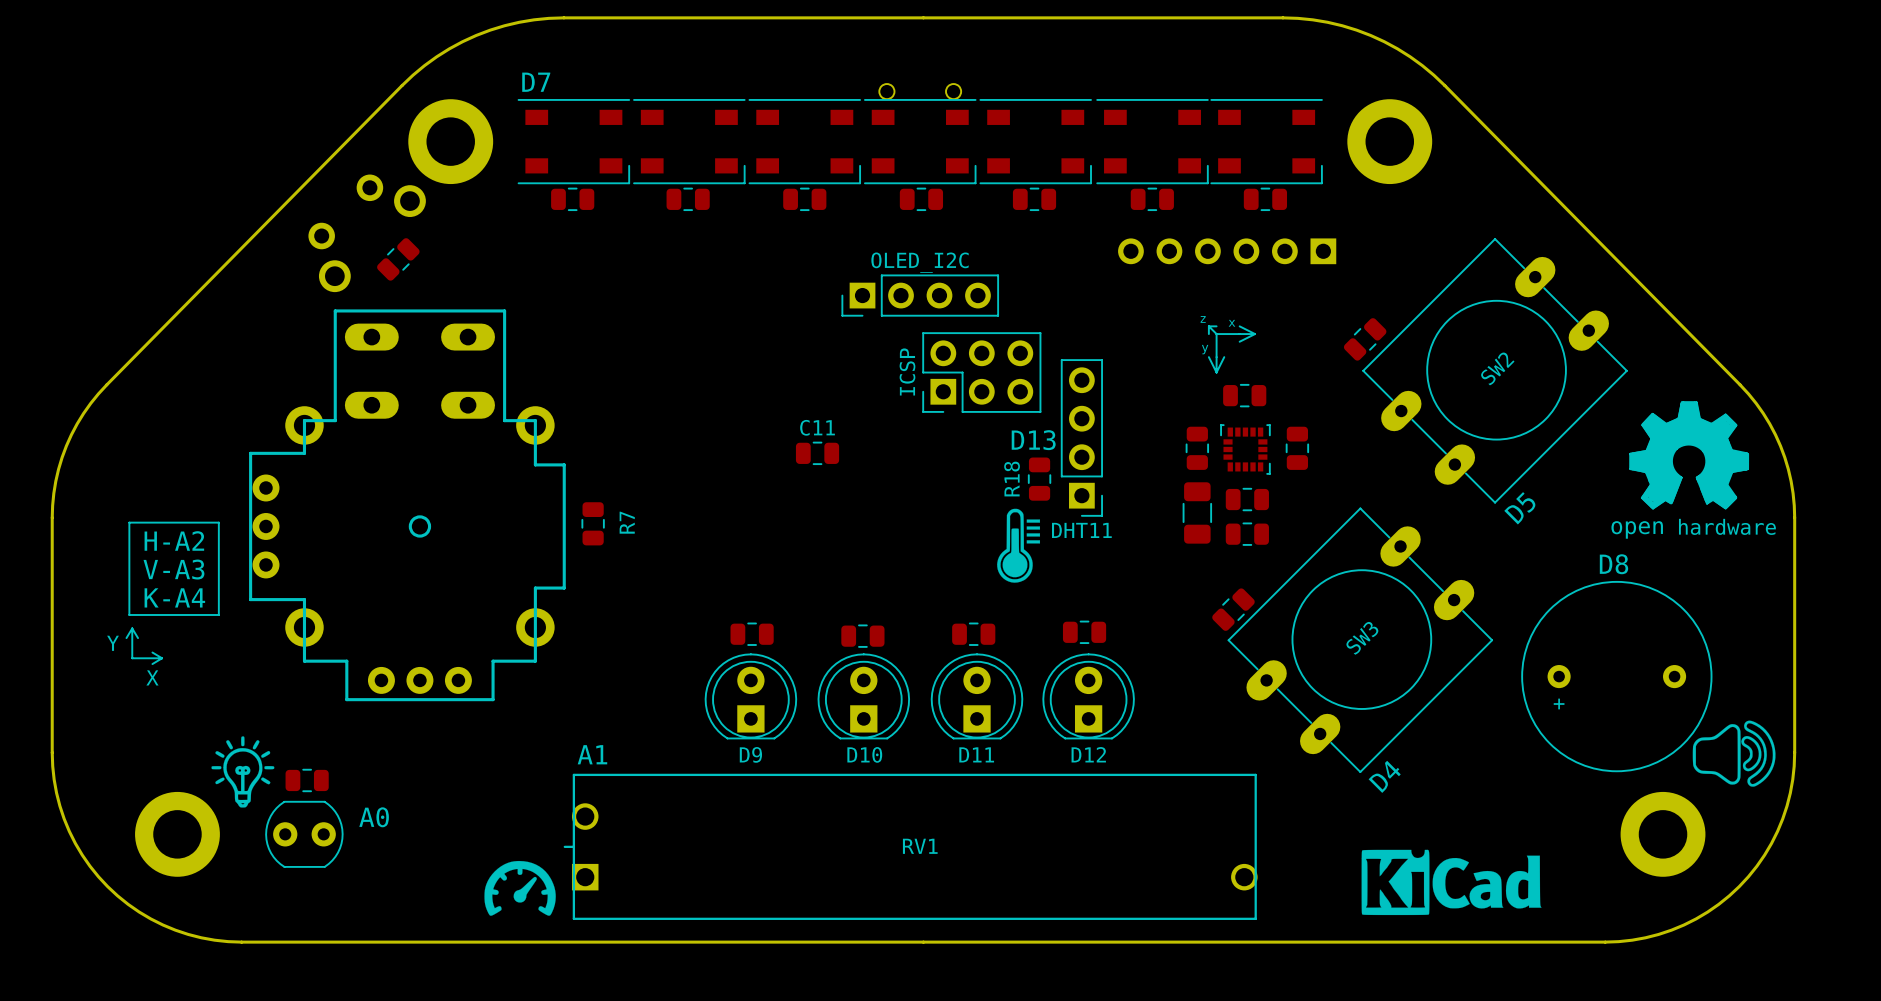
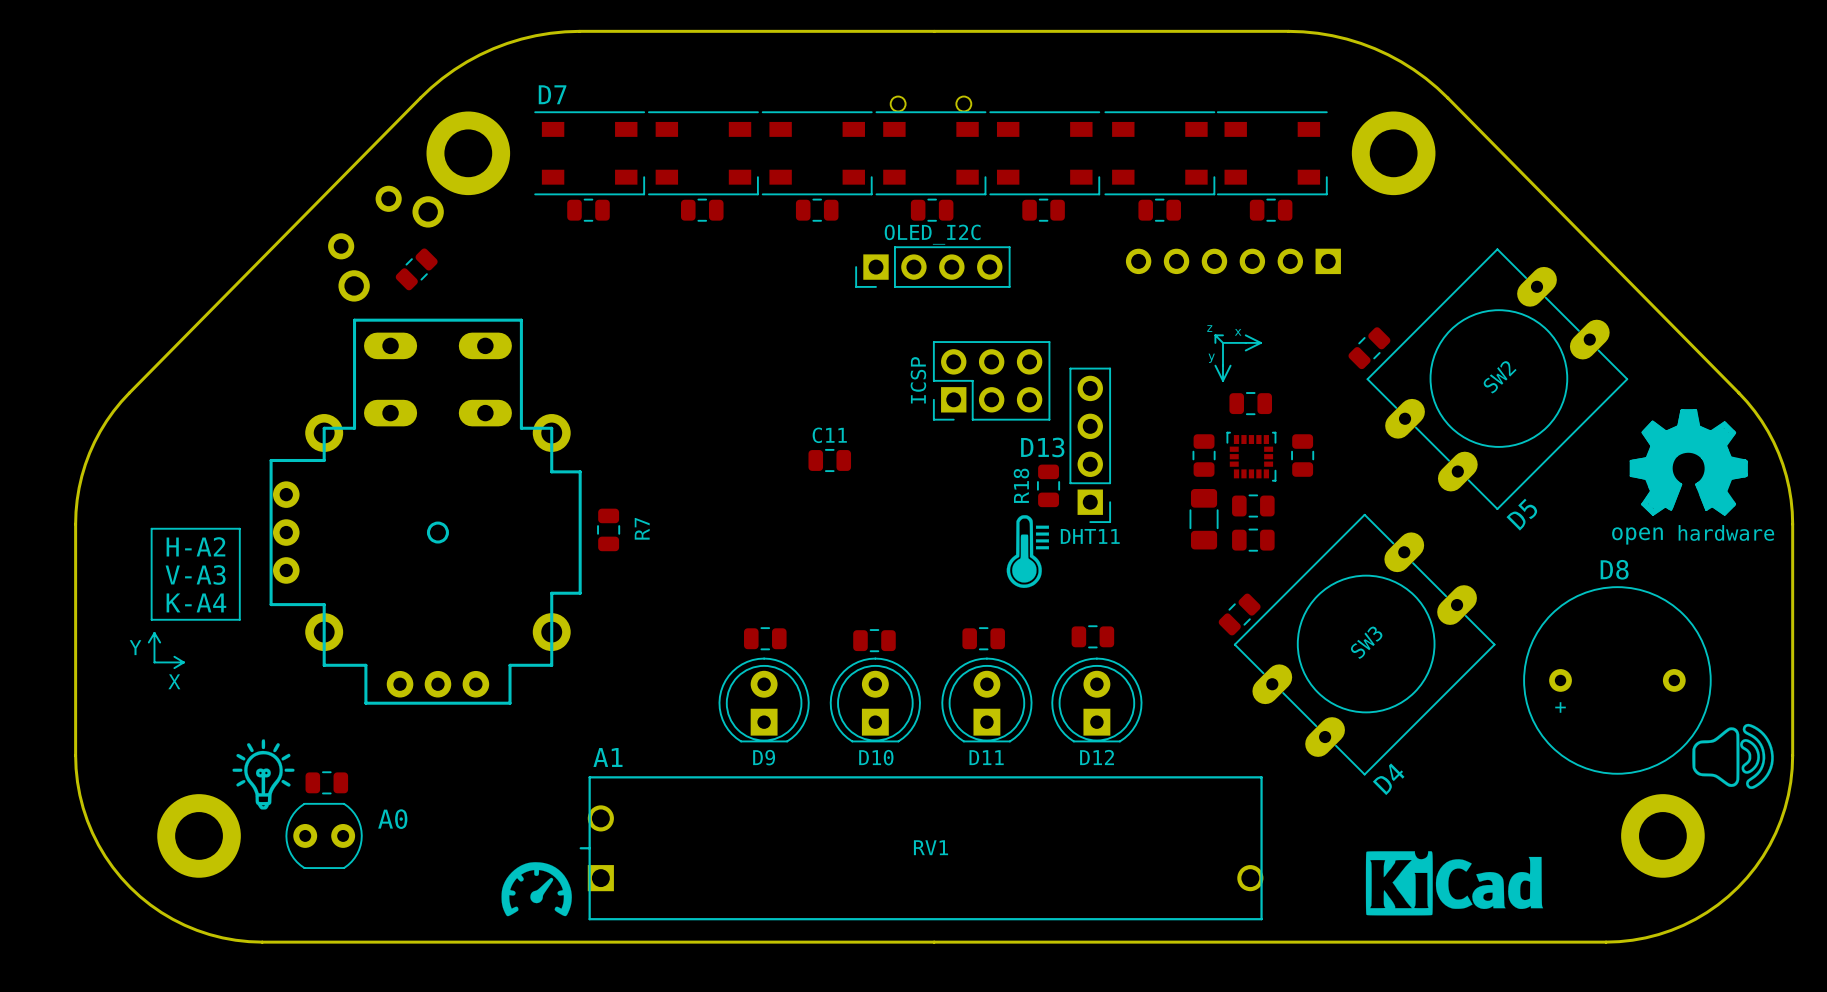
OLED_I2C position: (920, 295) -> (932, 267)

